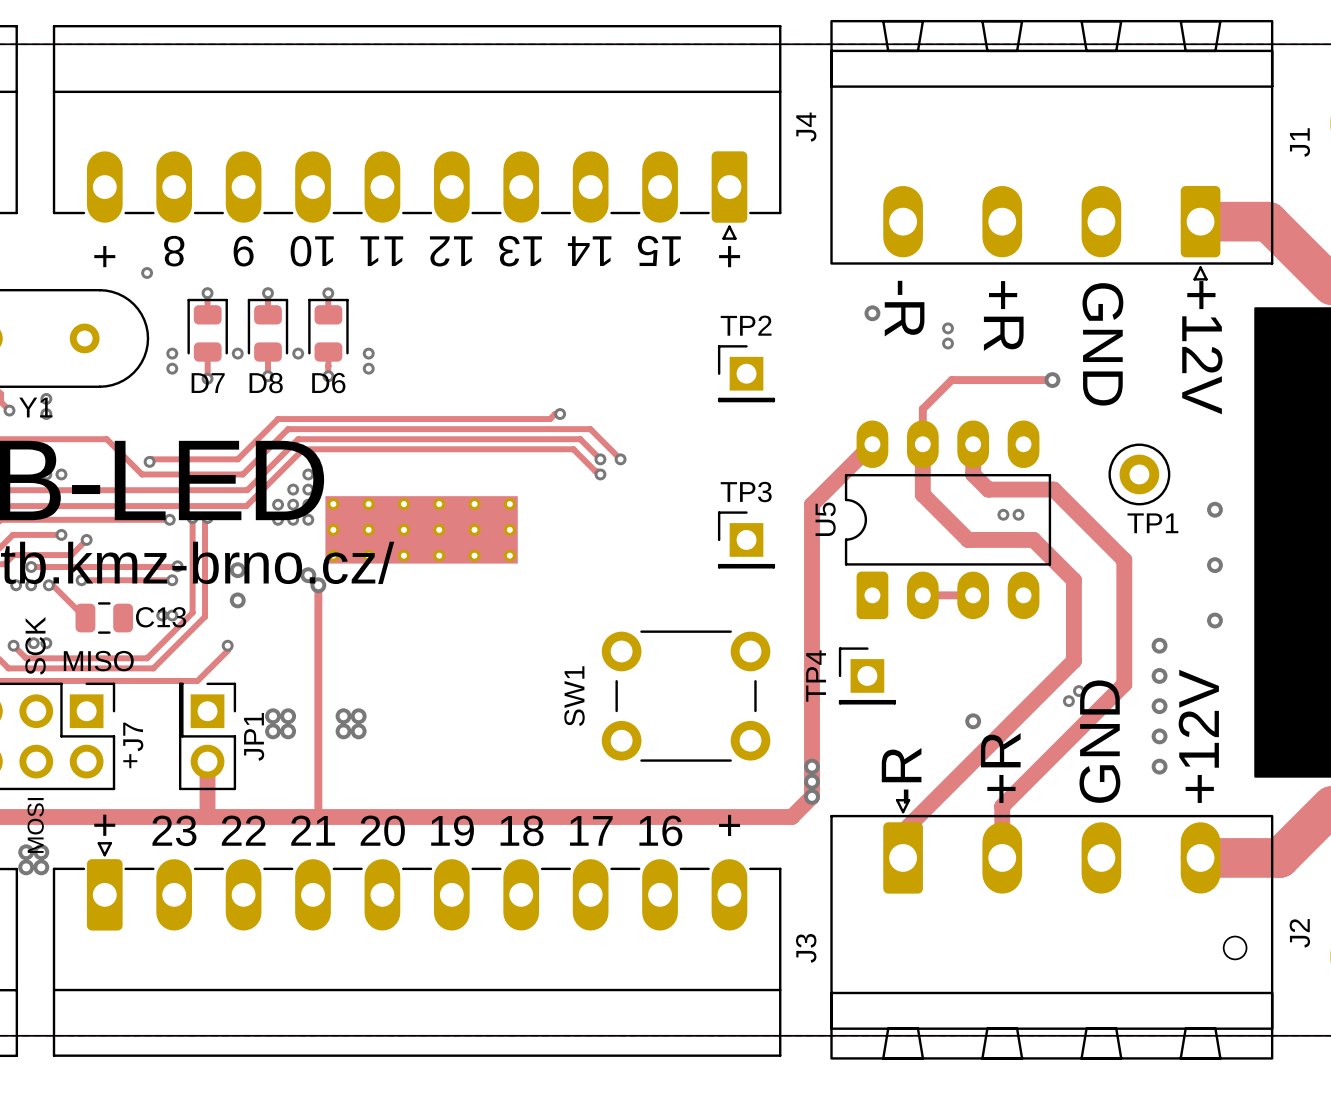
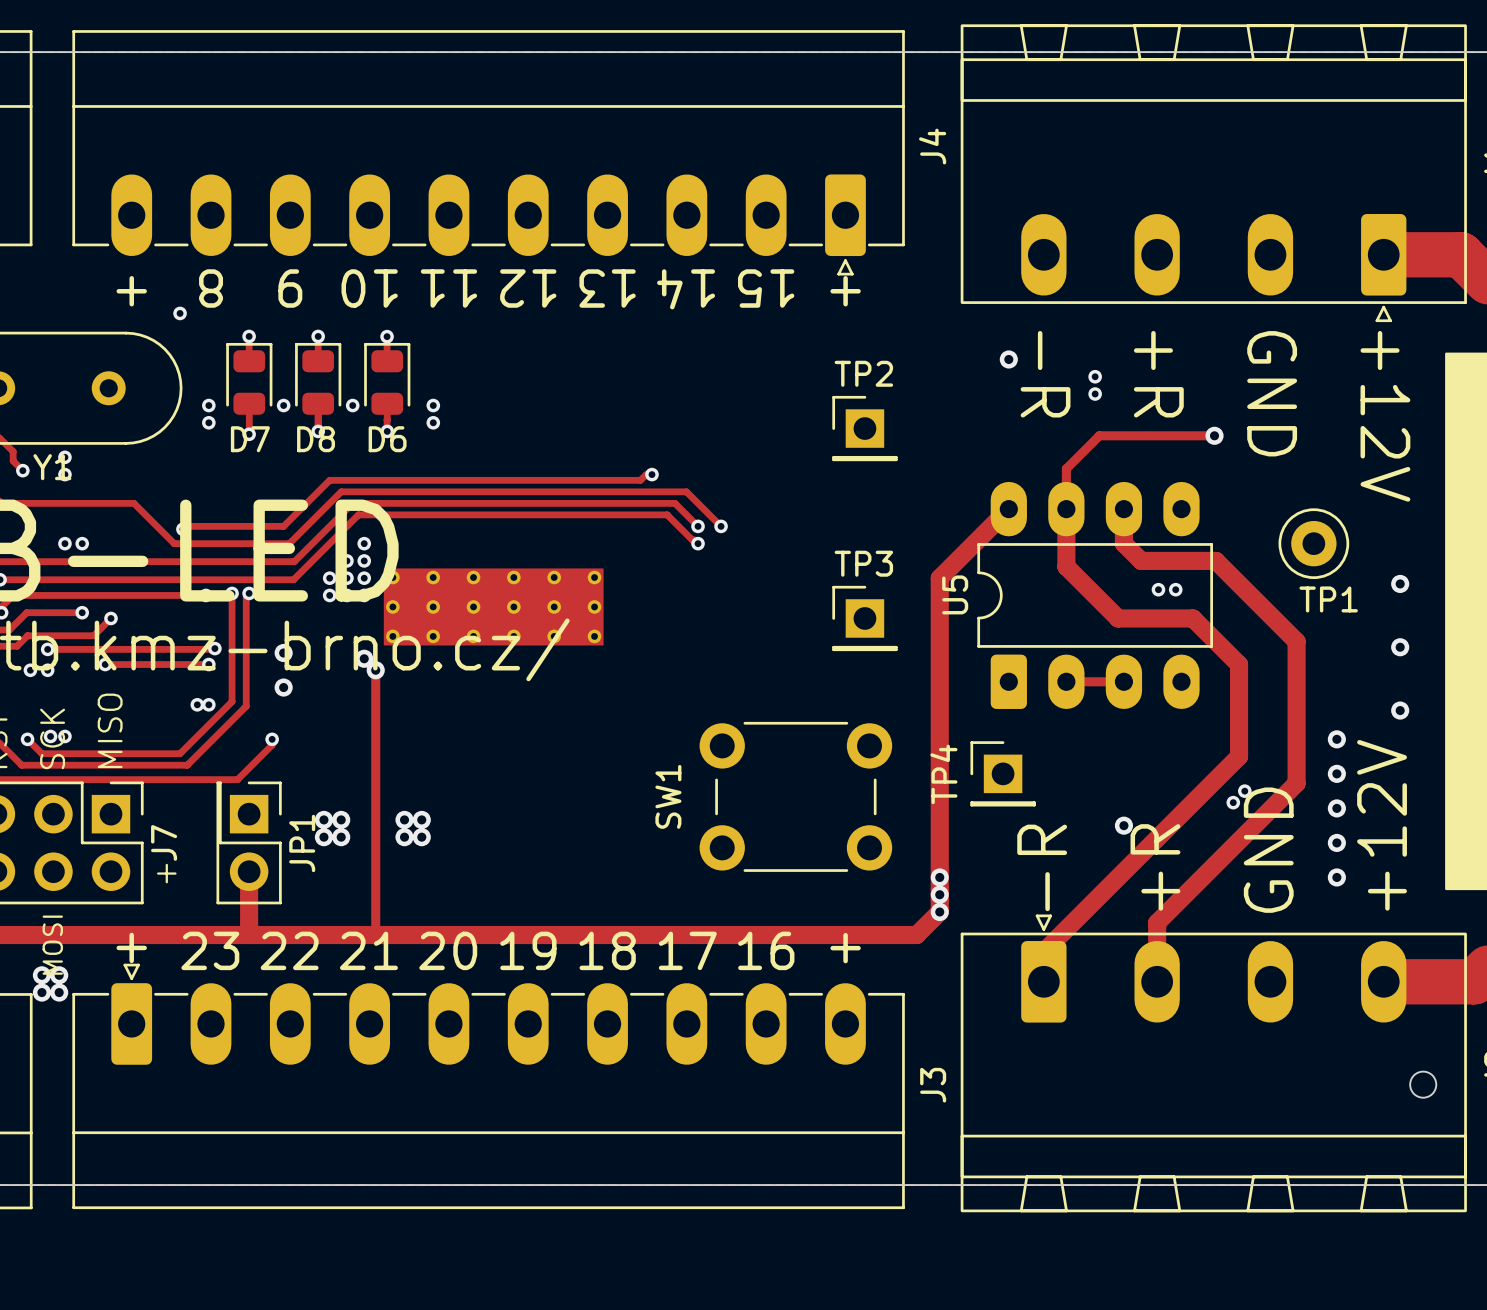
track: (48, 585) (52, 585) (85, 618) -> none
via: (48, 585) -> none
C13: (104, 618) -> none
text rotation: 0° (98, 661) -> 90° counterclockwise (110, 730)

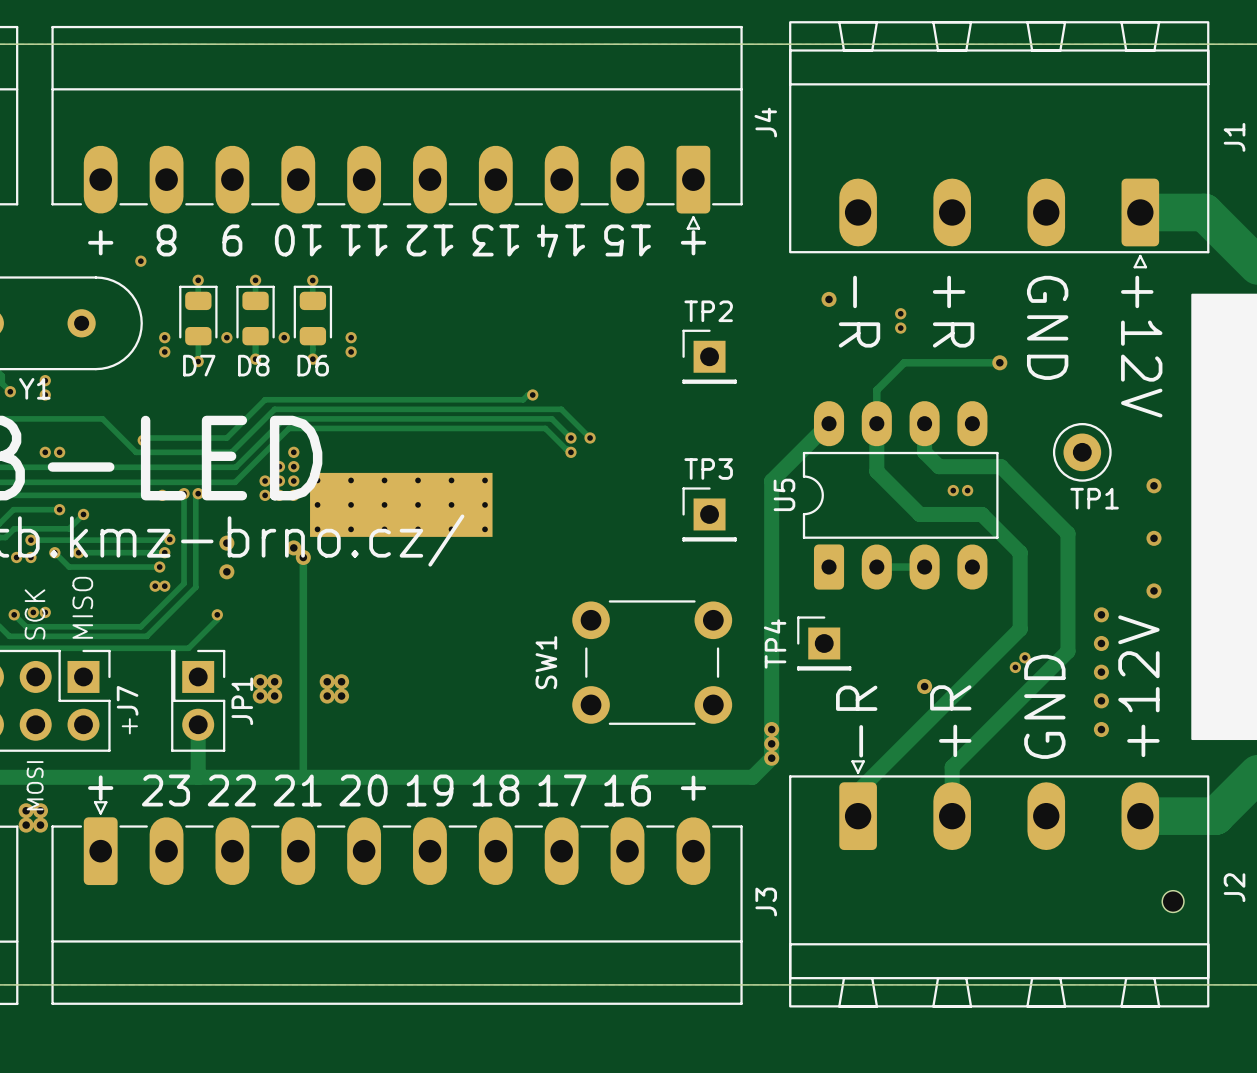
track: none -> (54, 552) (69, 567) (159, 567)
via: none -> (54, 552)
via: none -> (159, 567)

